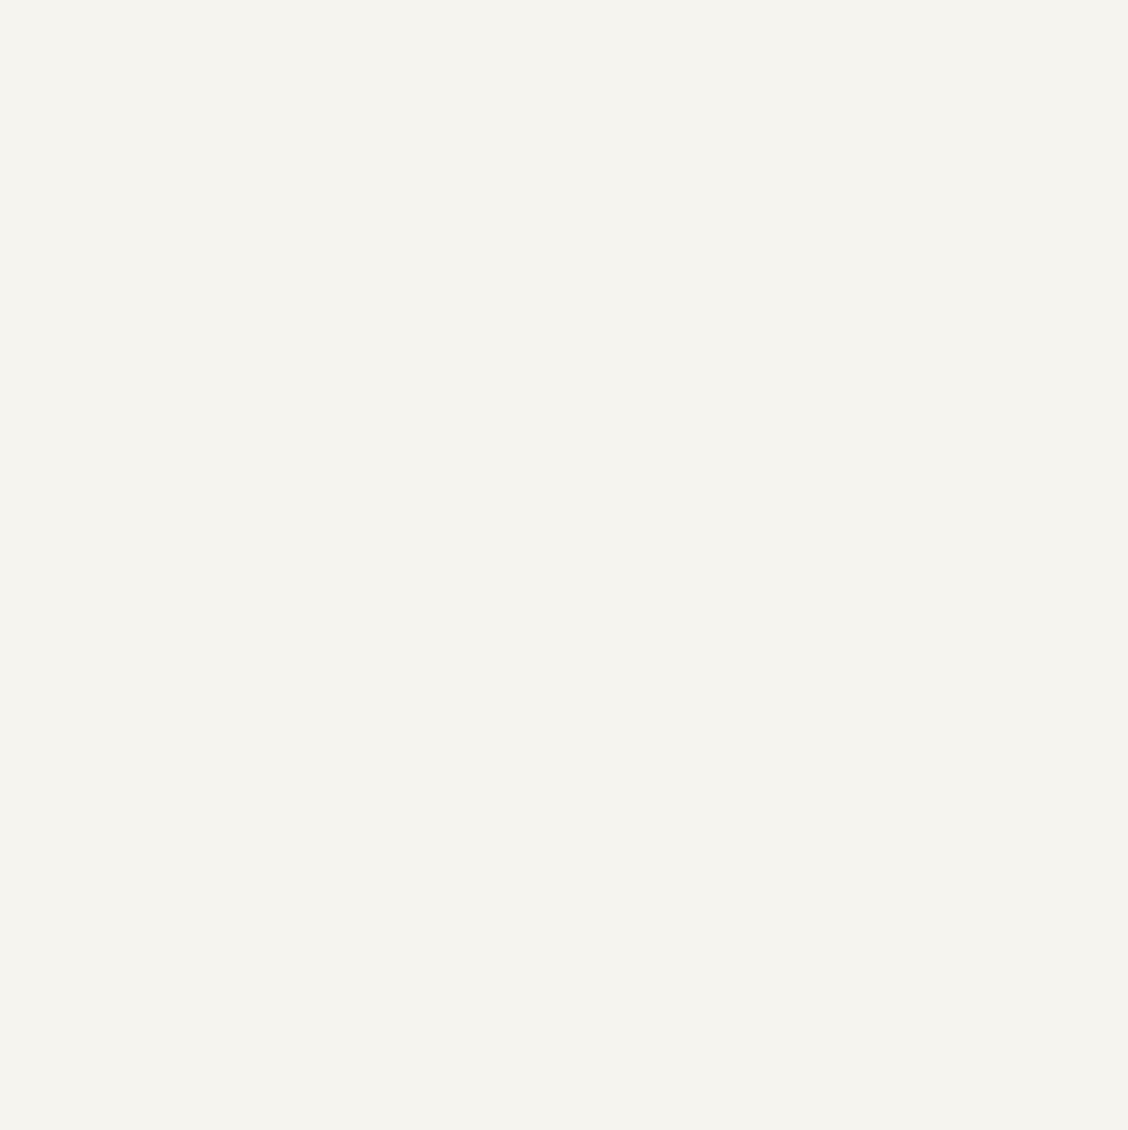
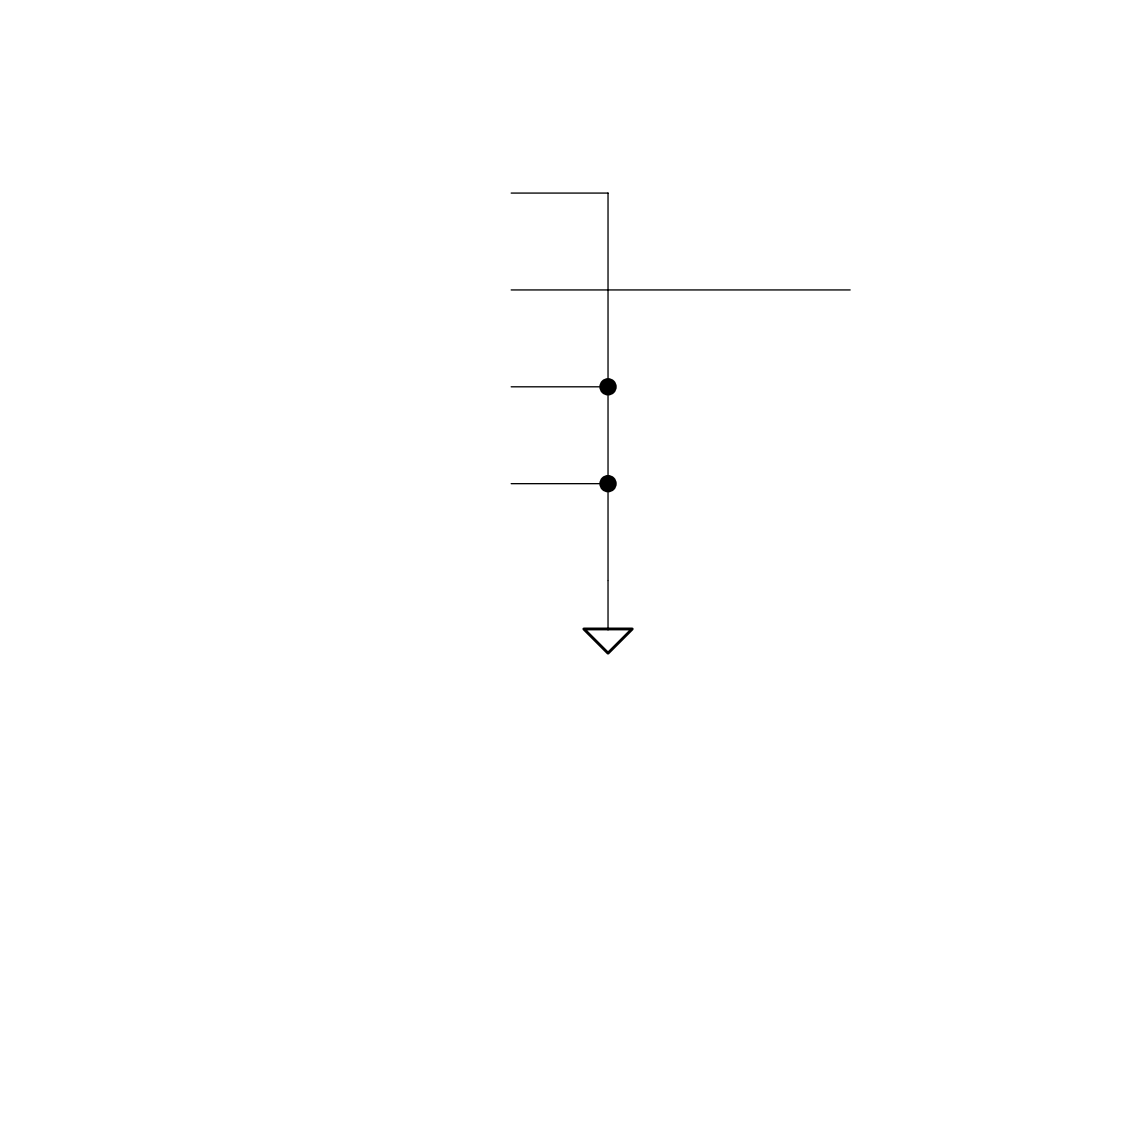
wire: none -> (511, 193) (608, 193) (608, 580)
wire: none -> (511, 289) (850, 289)
wire: none -> (511, 386) (608, 386)
junction: none -> (608, 386)
wire: none -> (511, 483) (608, 483)
junction: none -> (608, 483)
power symbol: none -> (608, 617)

